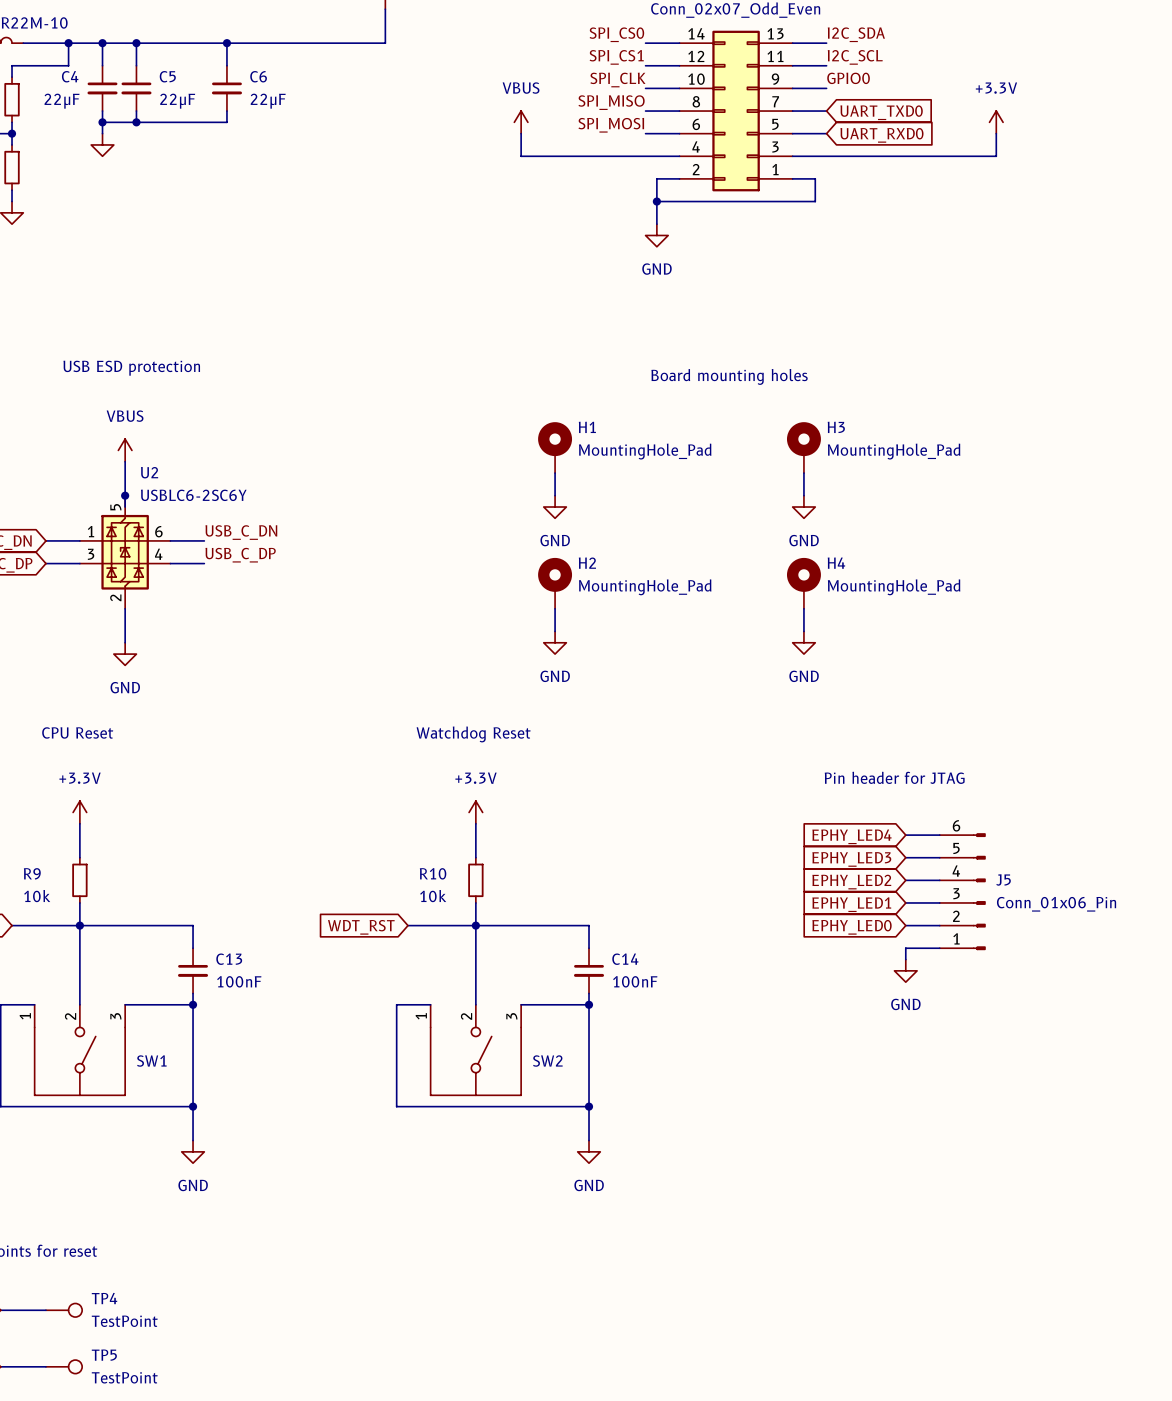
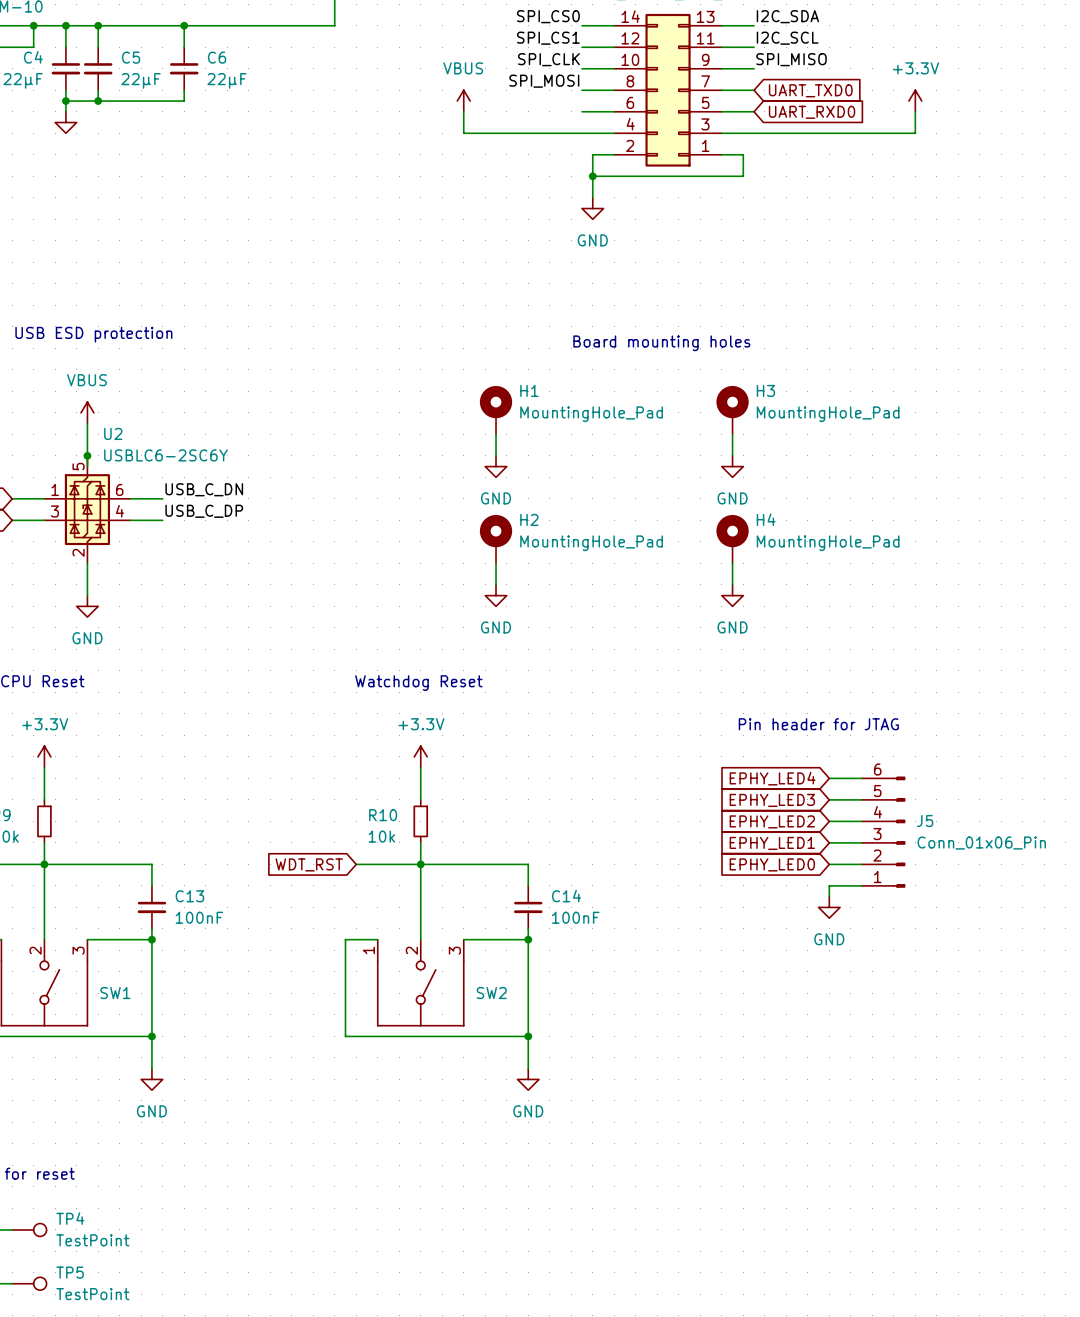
label: GPIO0 (848, 78) -> SPI_MISO (791, 59)
label: SPI_MISO (611, 102) -> SPI_MOSI (544, 81)
label: SPI_MOSI (611, 125) -> none

